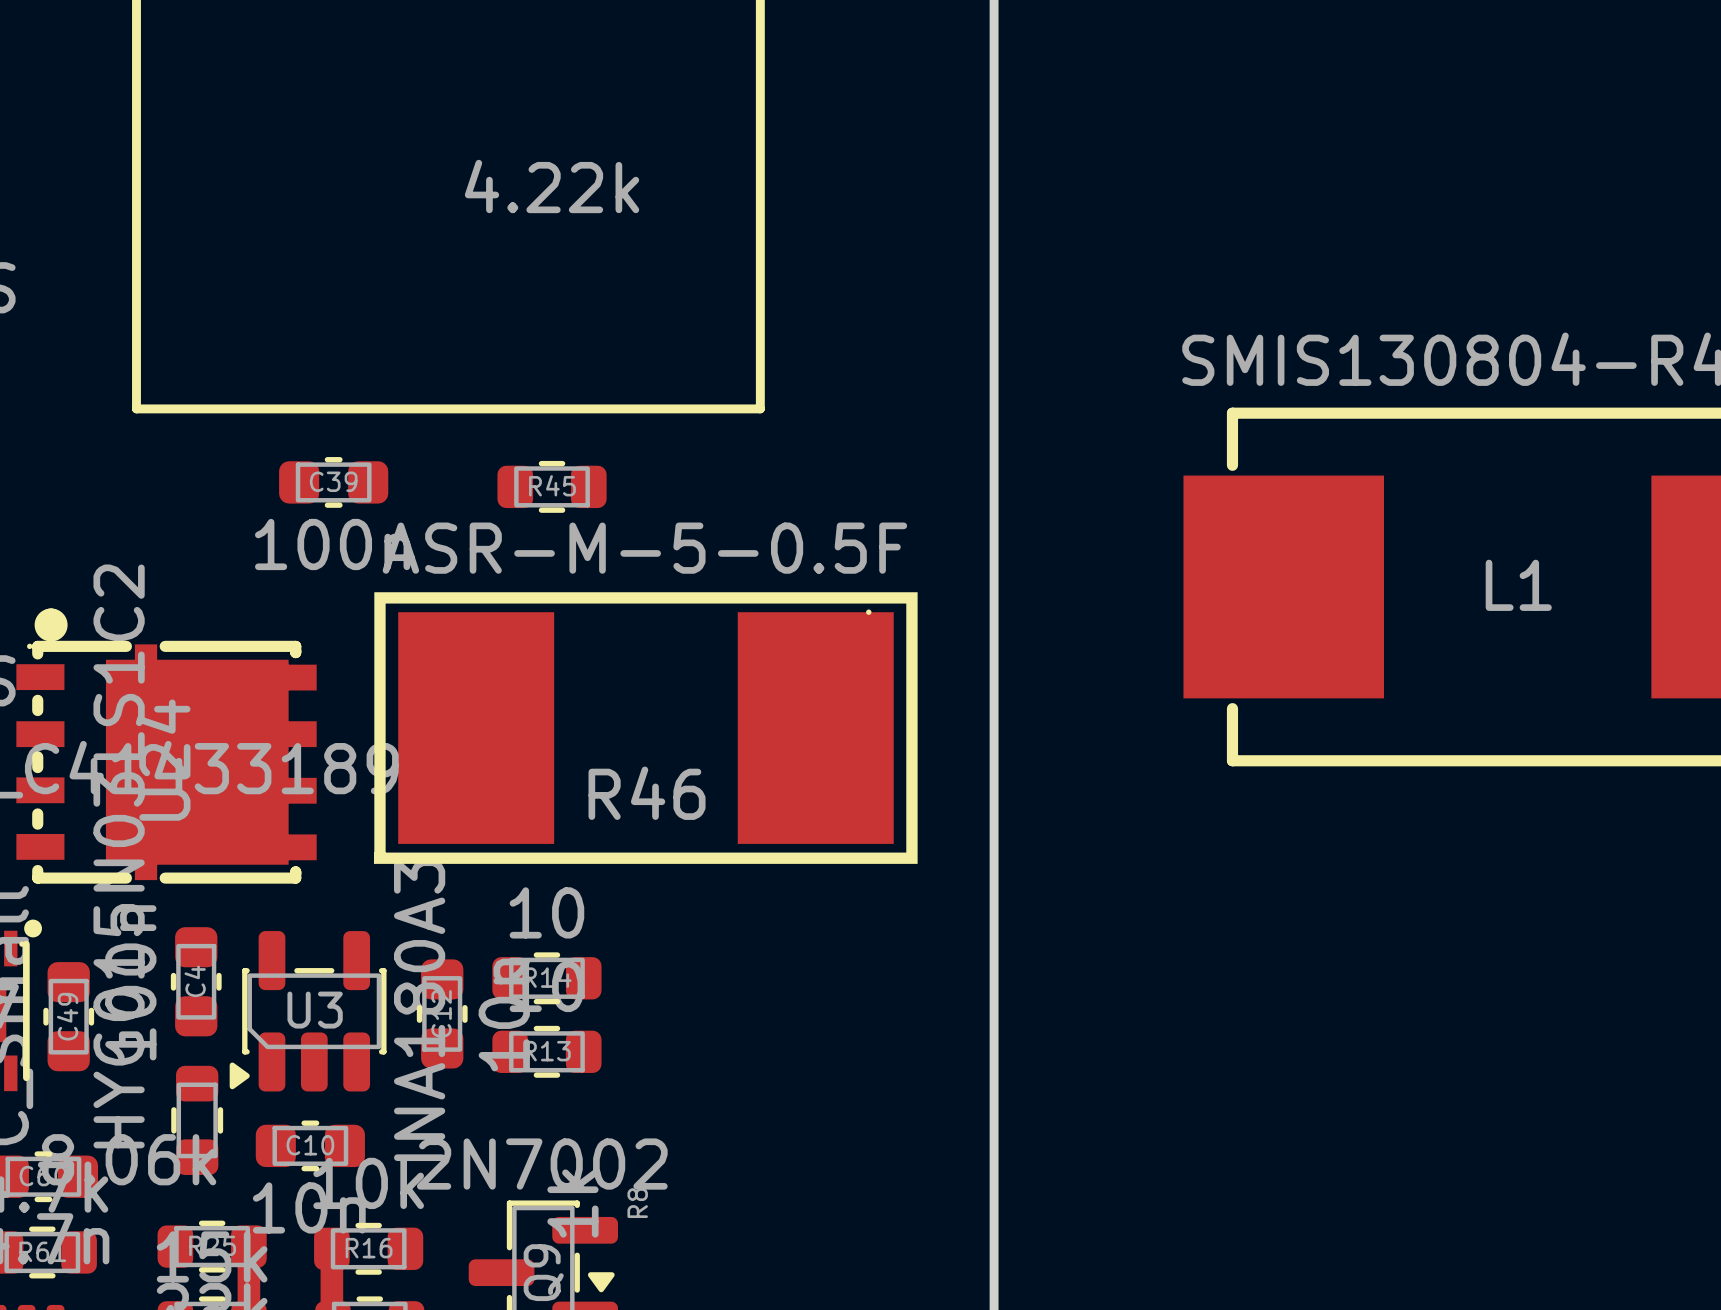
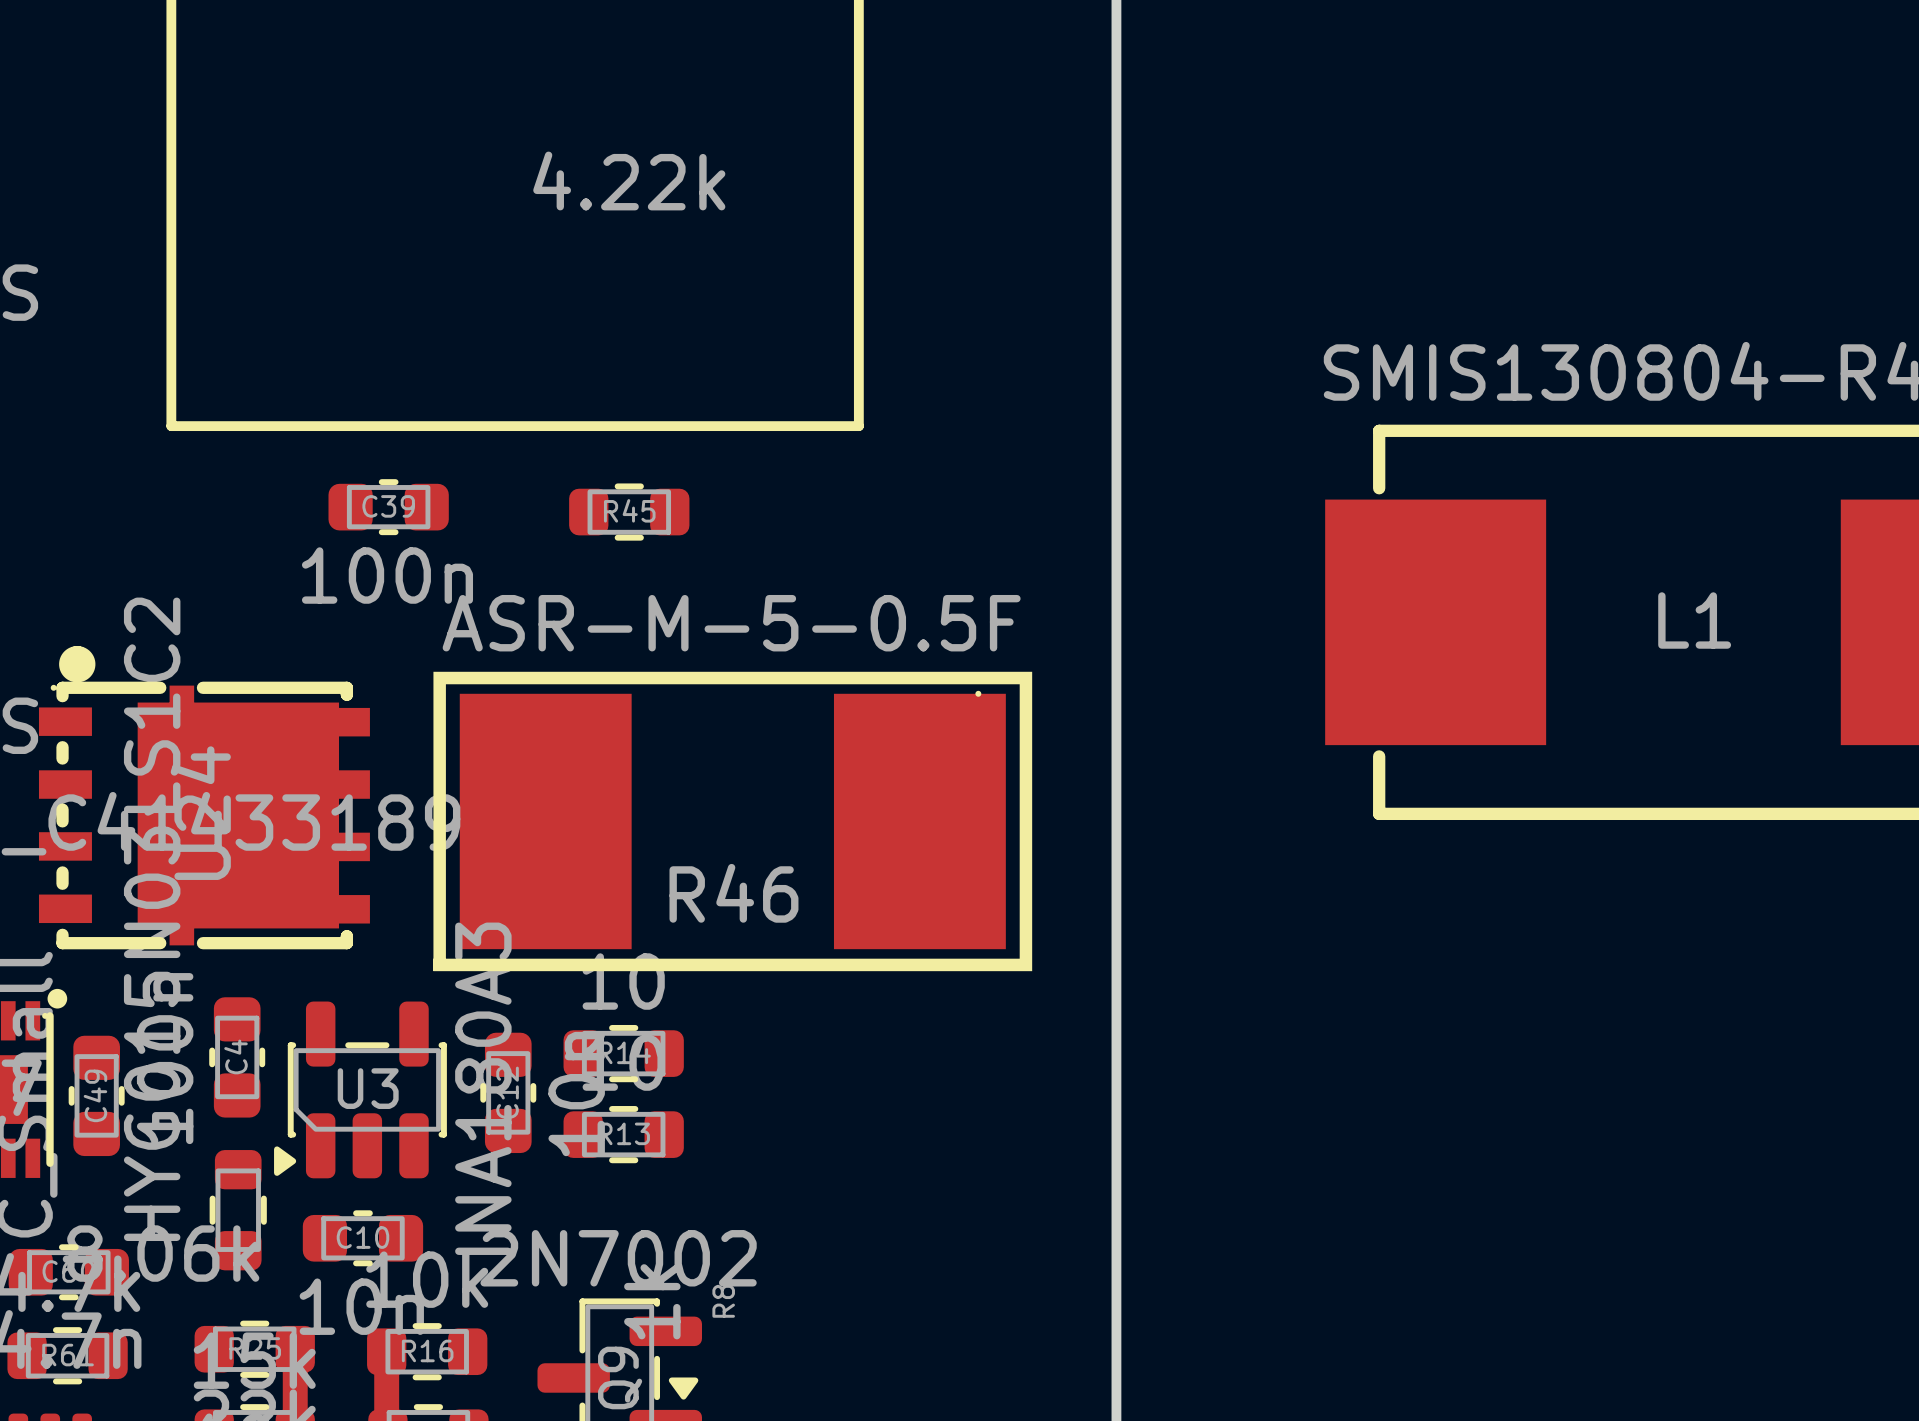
R46 position: (645, 728) -> (732, 821)

